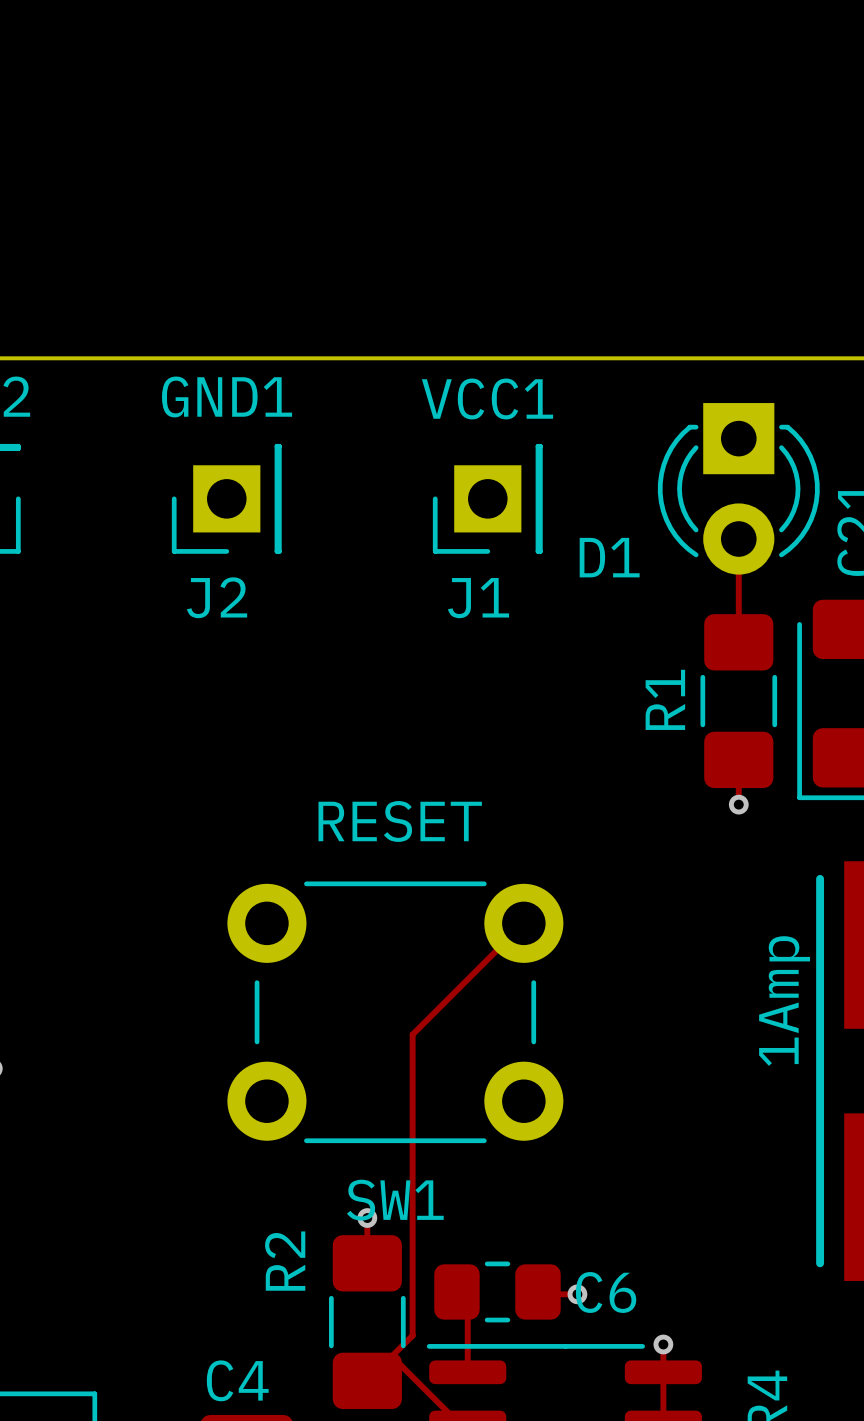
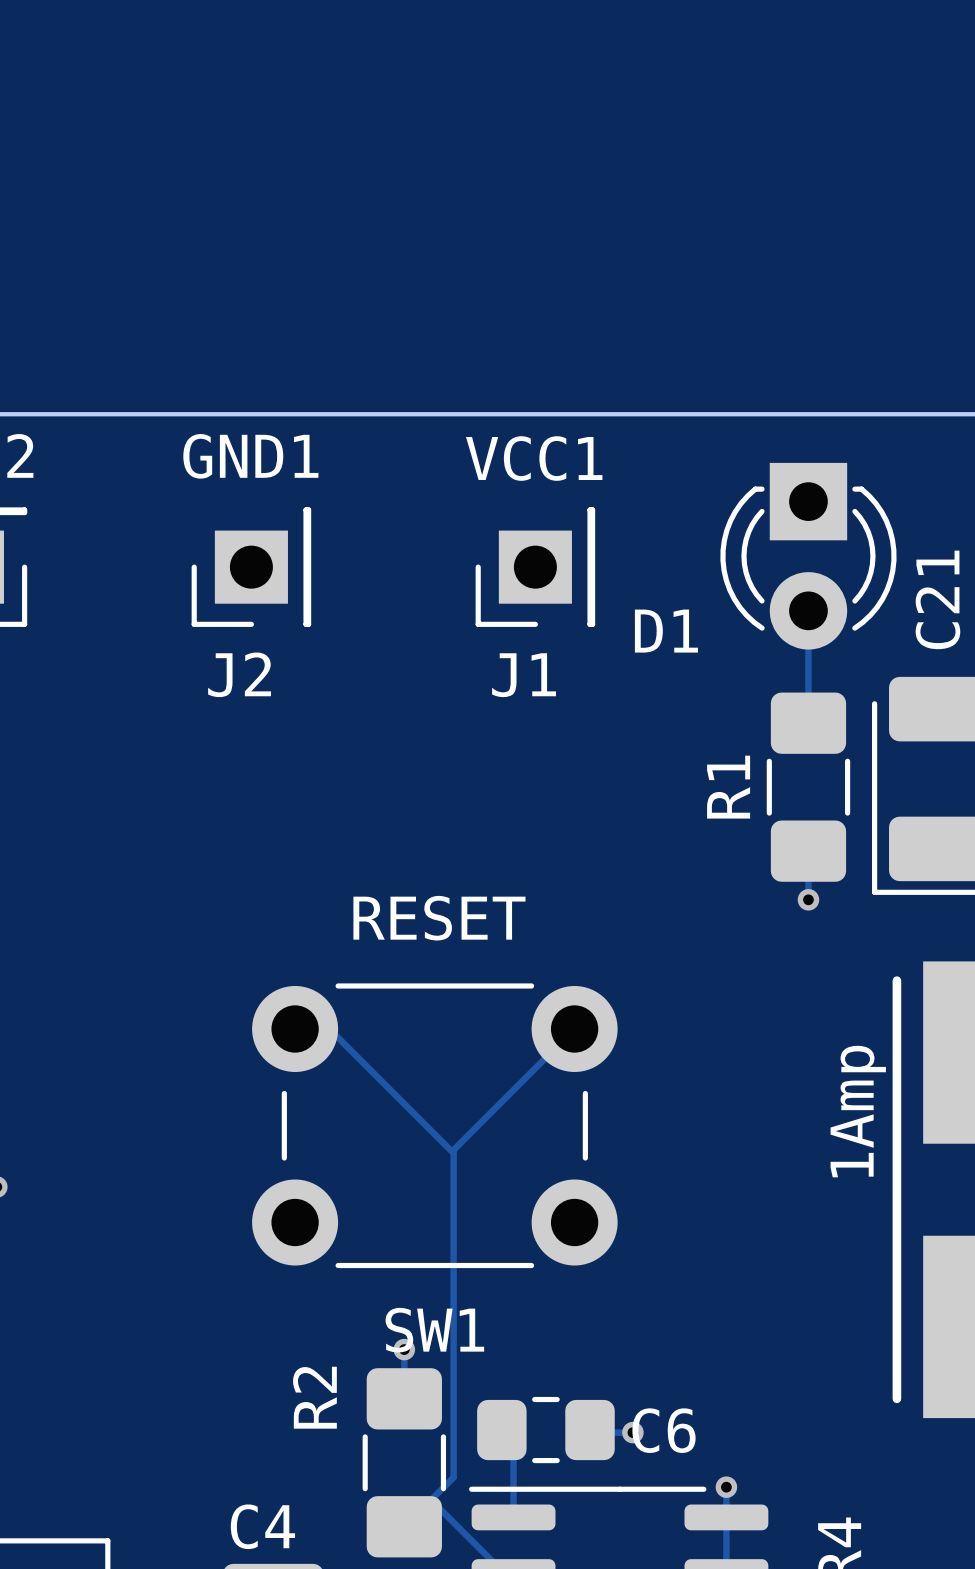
track: none -> (295, 1028) (329, 1028) (451, 1151)

